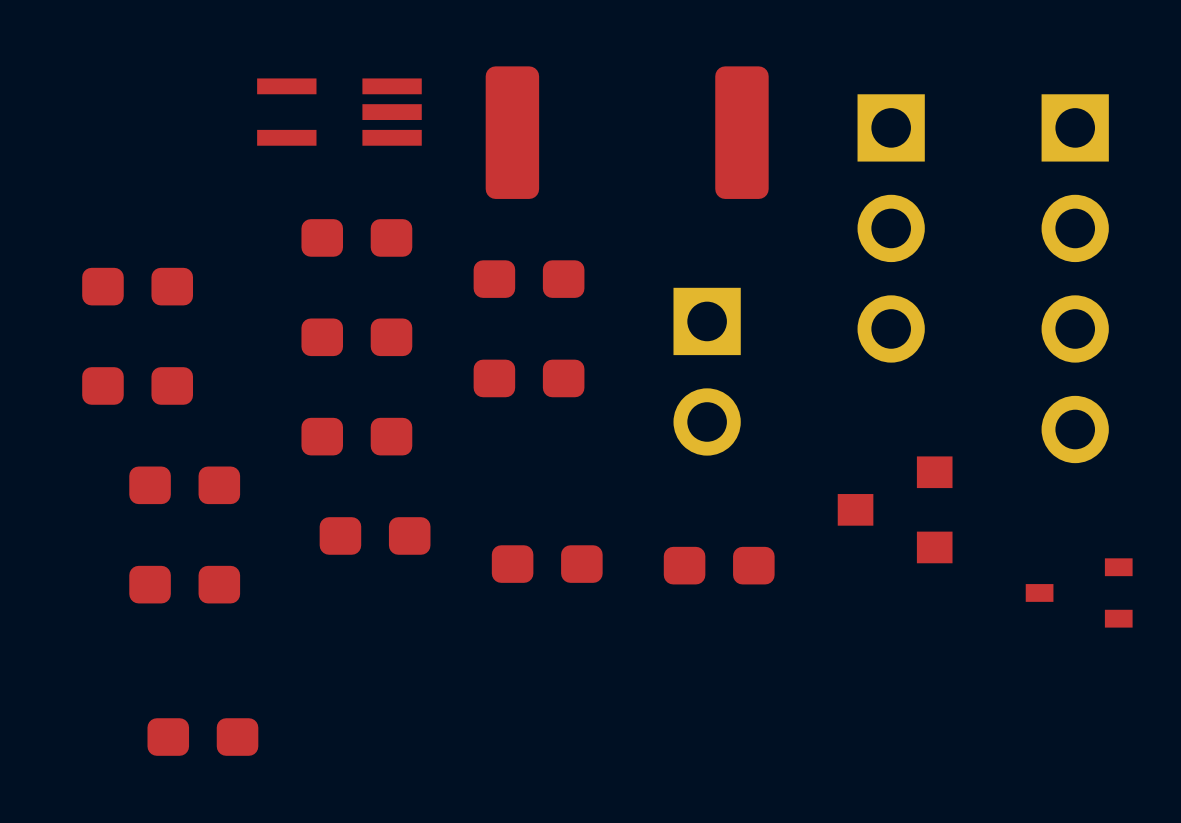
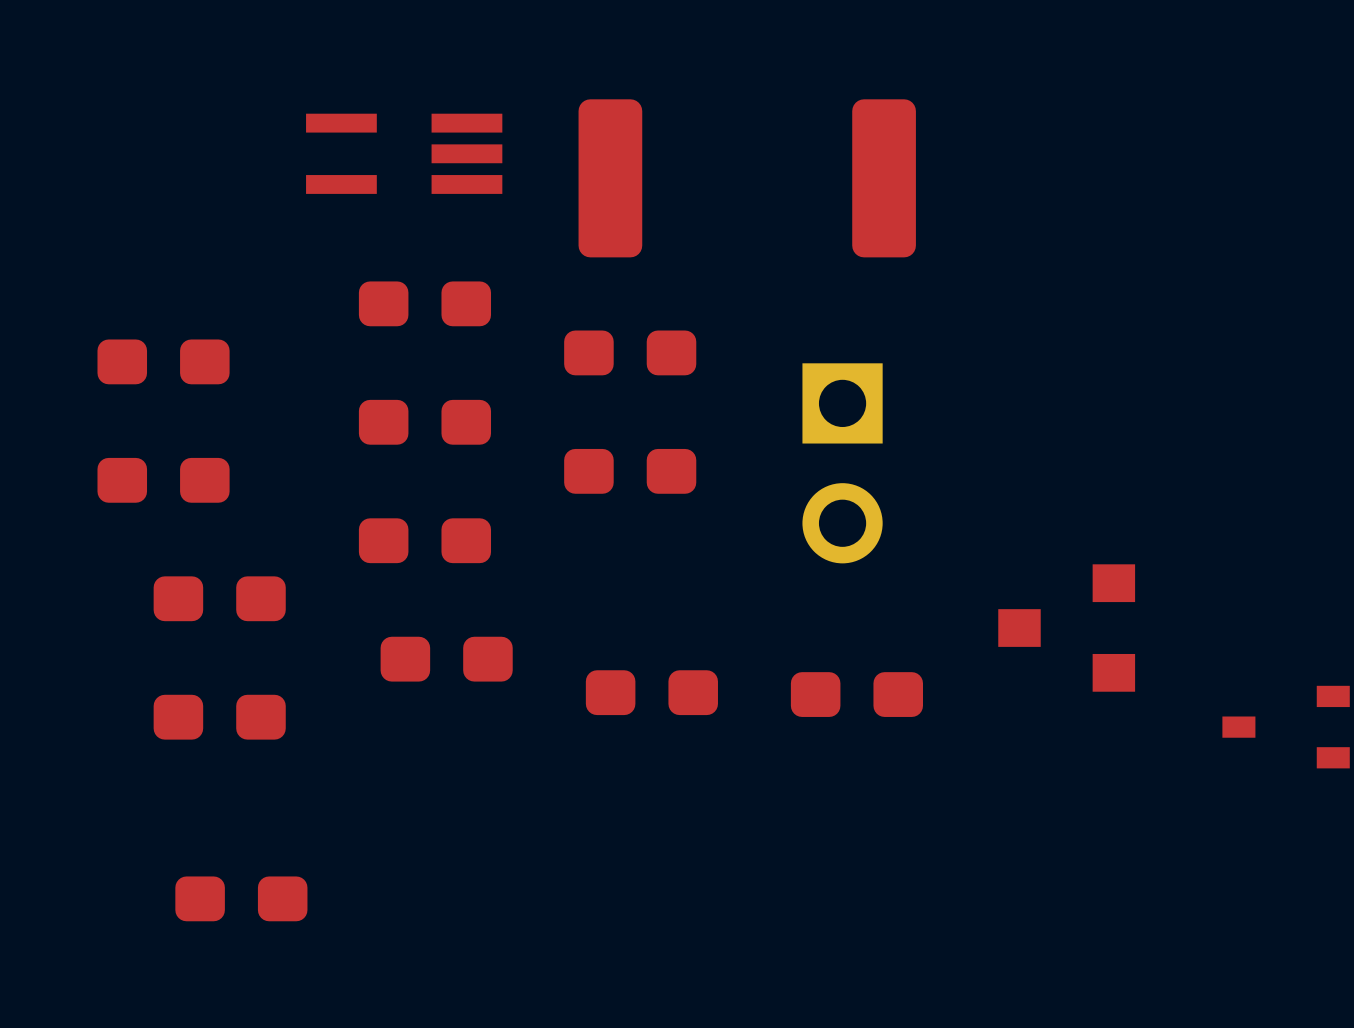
part: (891, 228) -> none
part: (1075, 278) -> none

